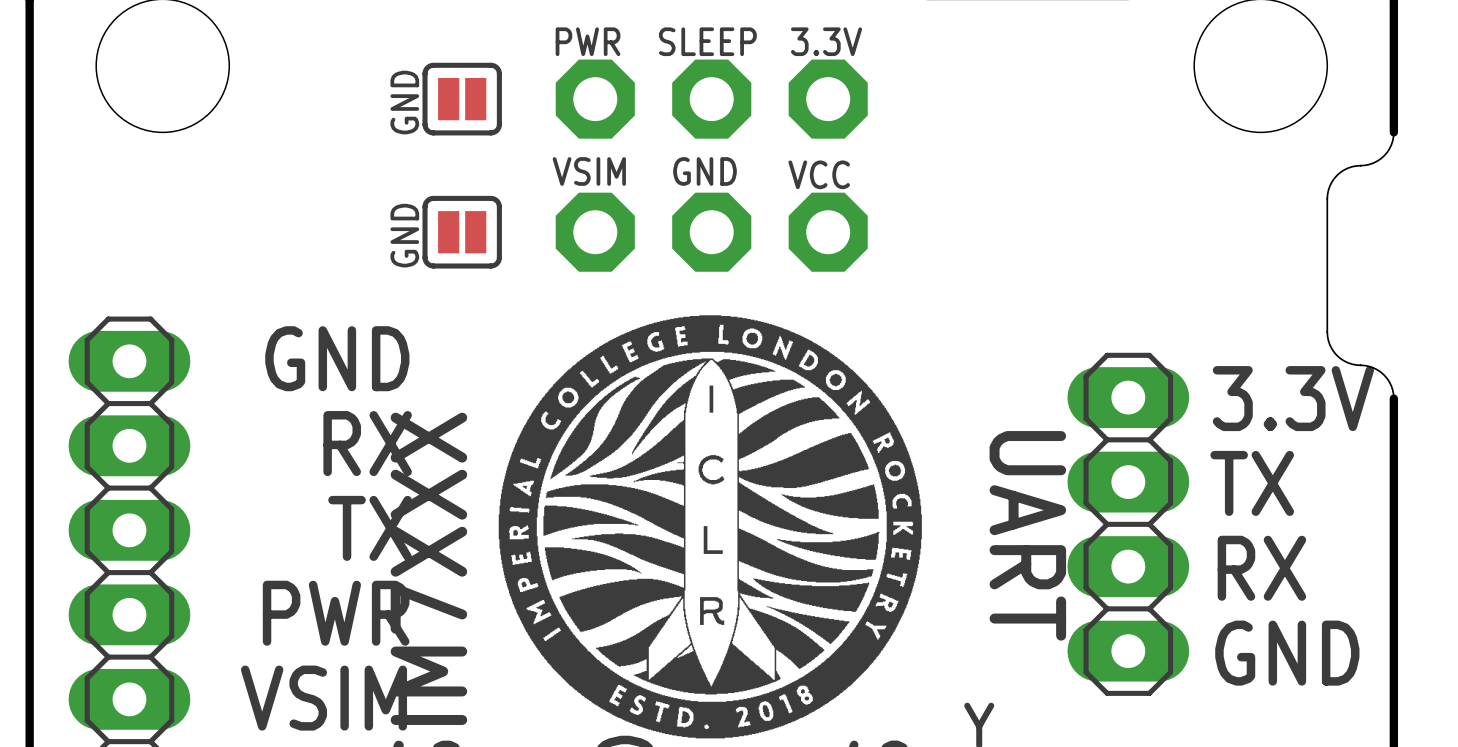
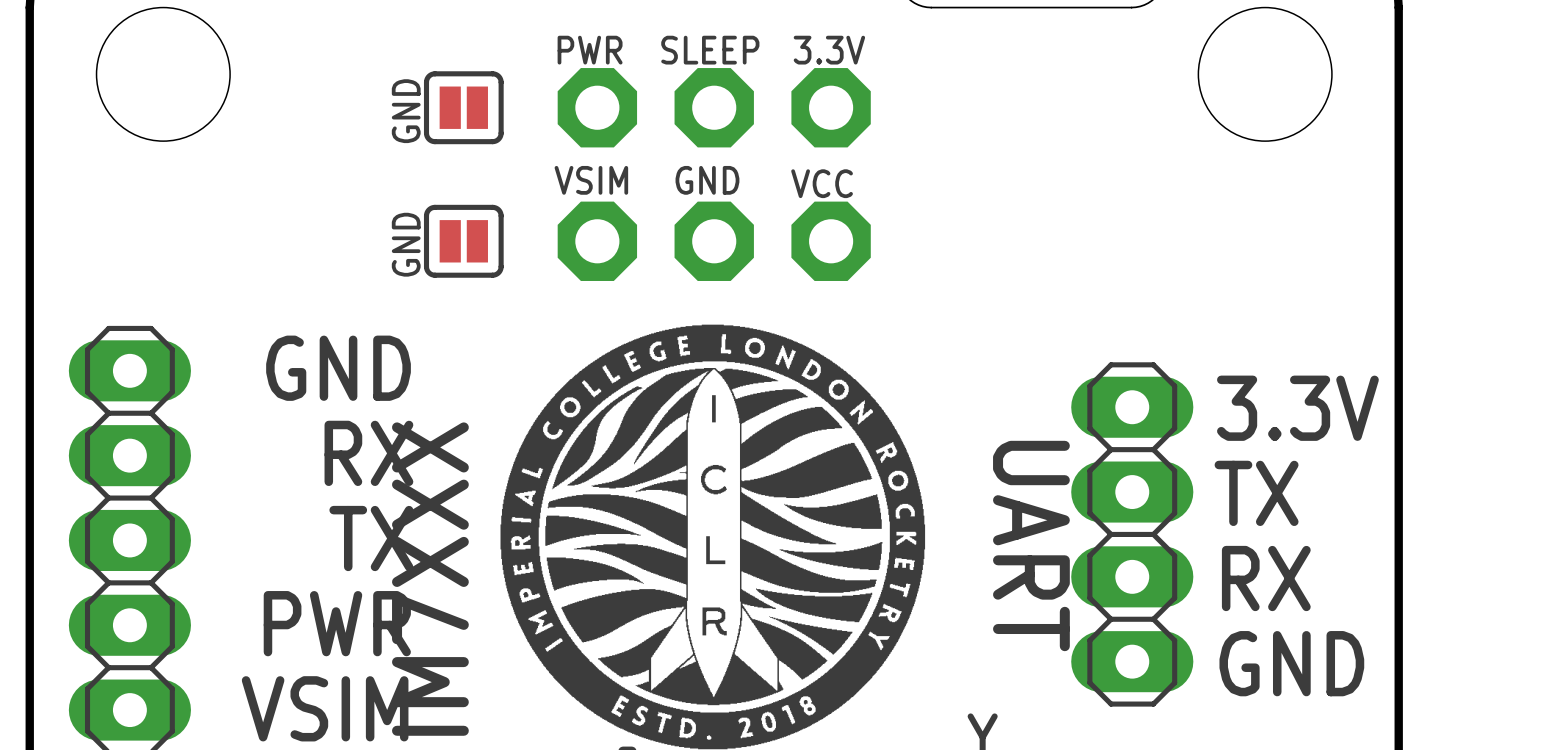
board edge: (1393, 132) (1391, 145) (1384, 155) (1373, 163) (1351, 166) (1340, 172) (1329, 186) (1327, 198) (1328, 340) (1334, 352) (1343, 360) (1373, 367) (1384, 375) (1391, 385) (1393, 398) -> (1398, 141) (1398, 408)

